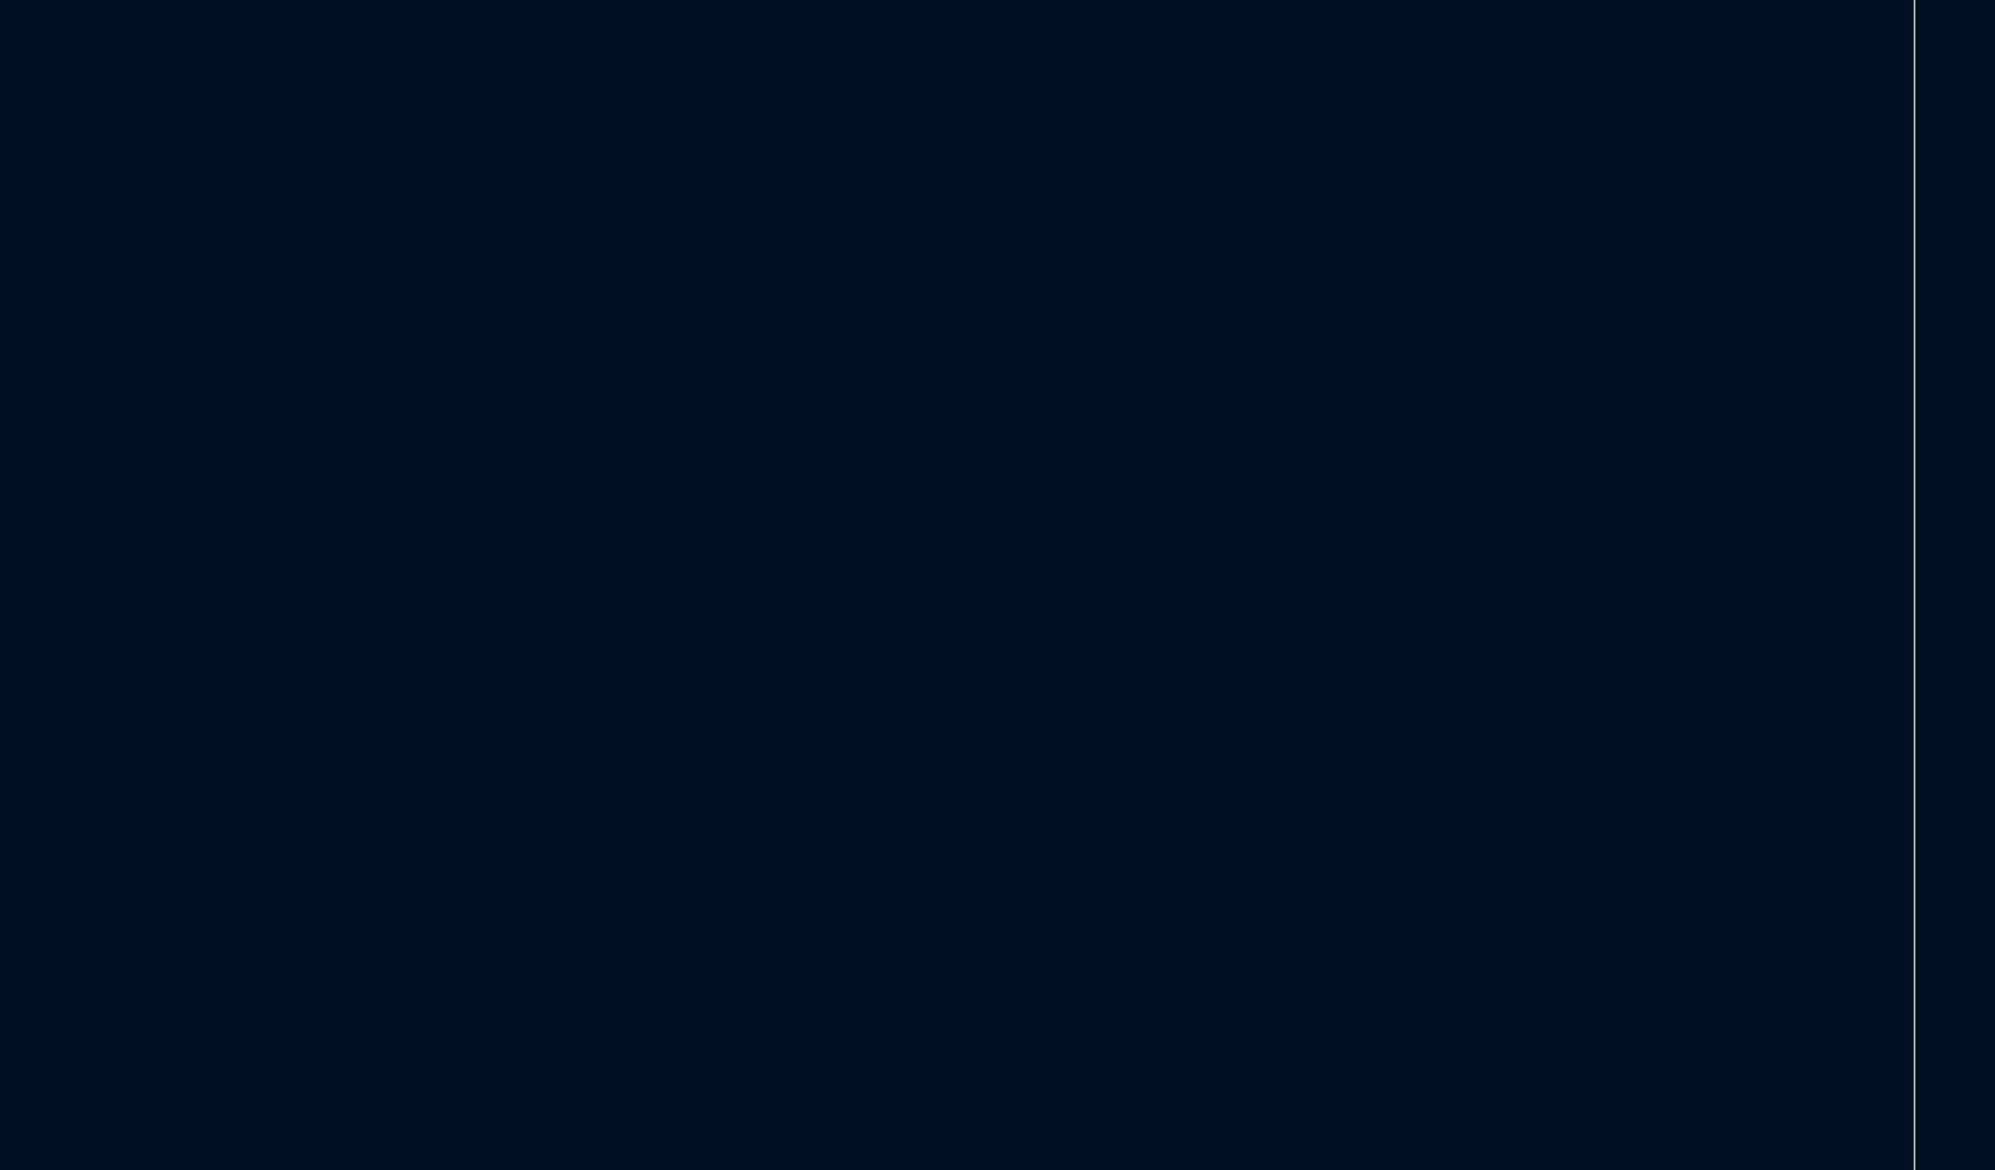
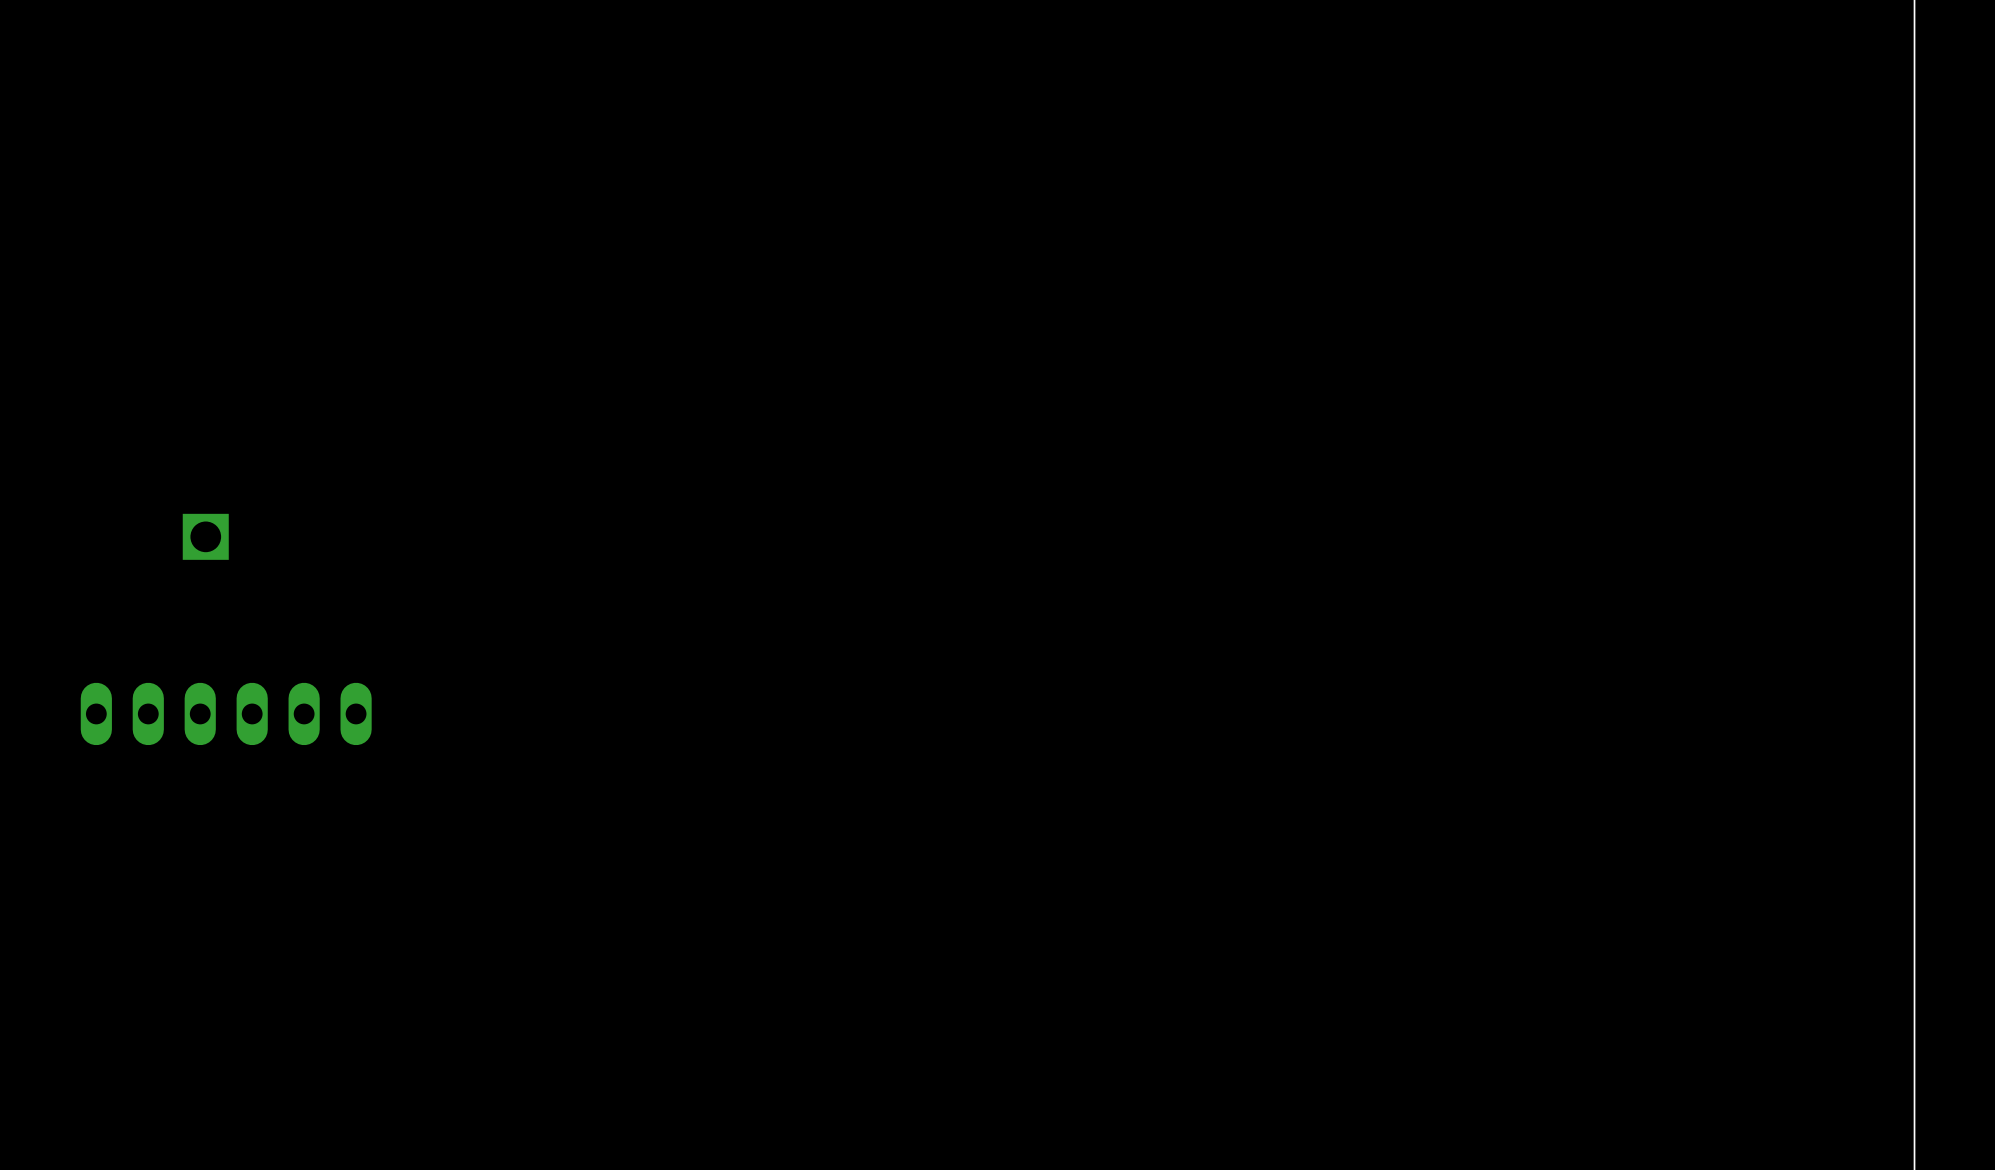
part: none -> (205, 536)
part: none -> (226, 713)

